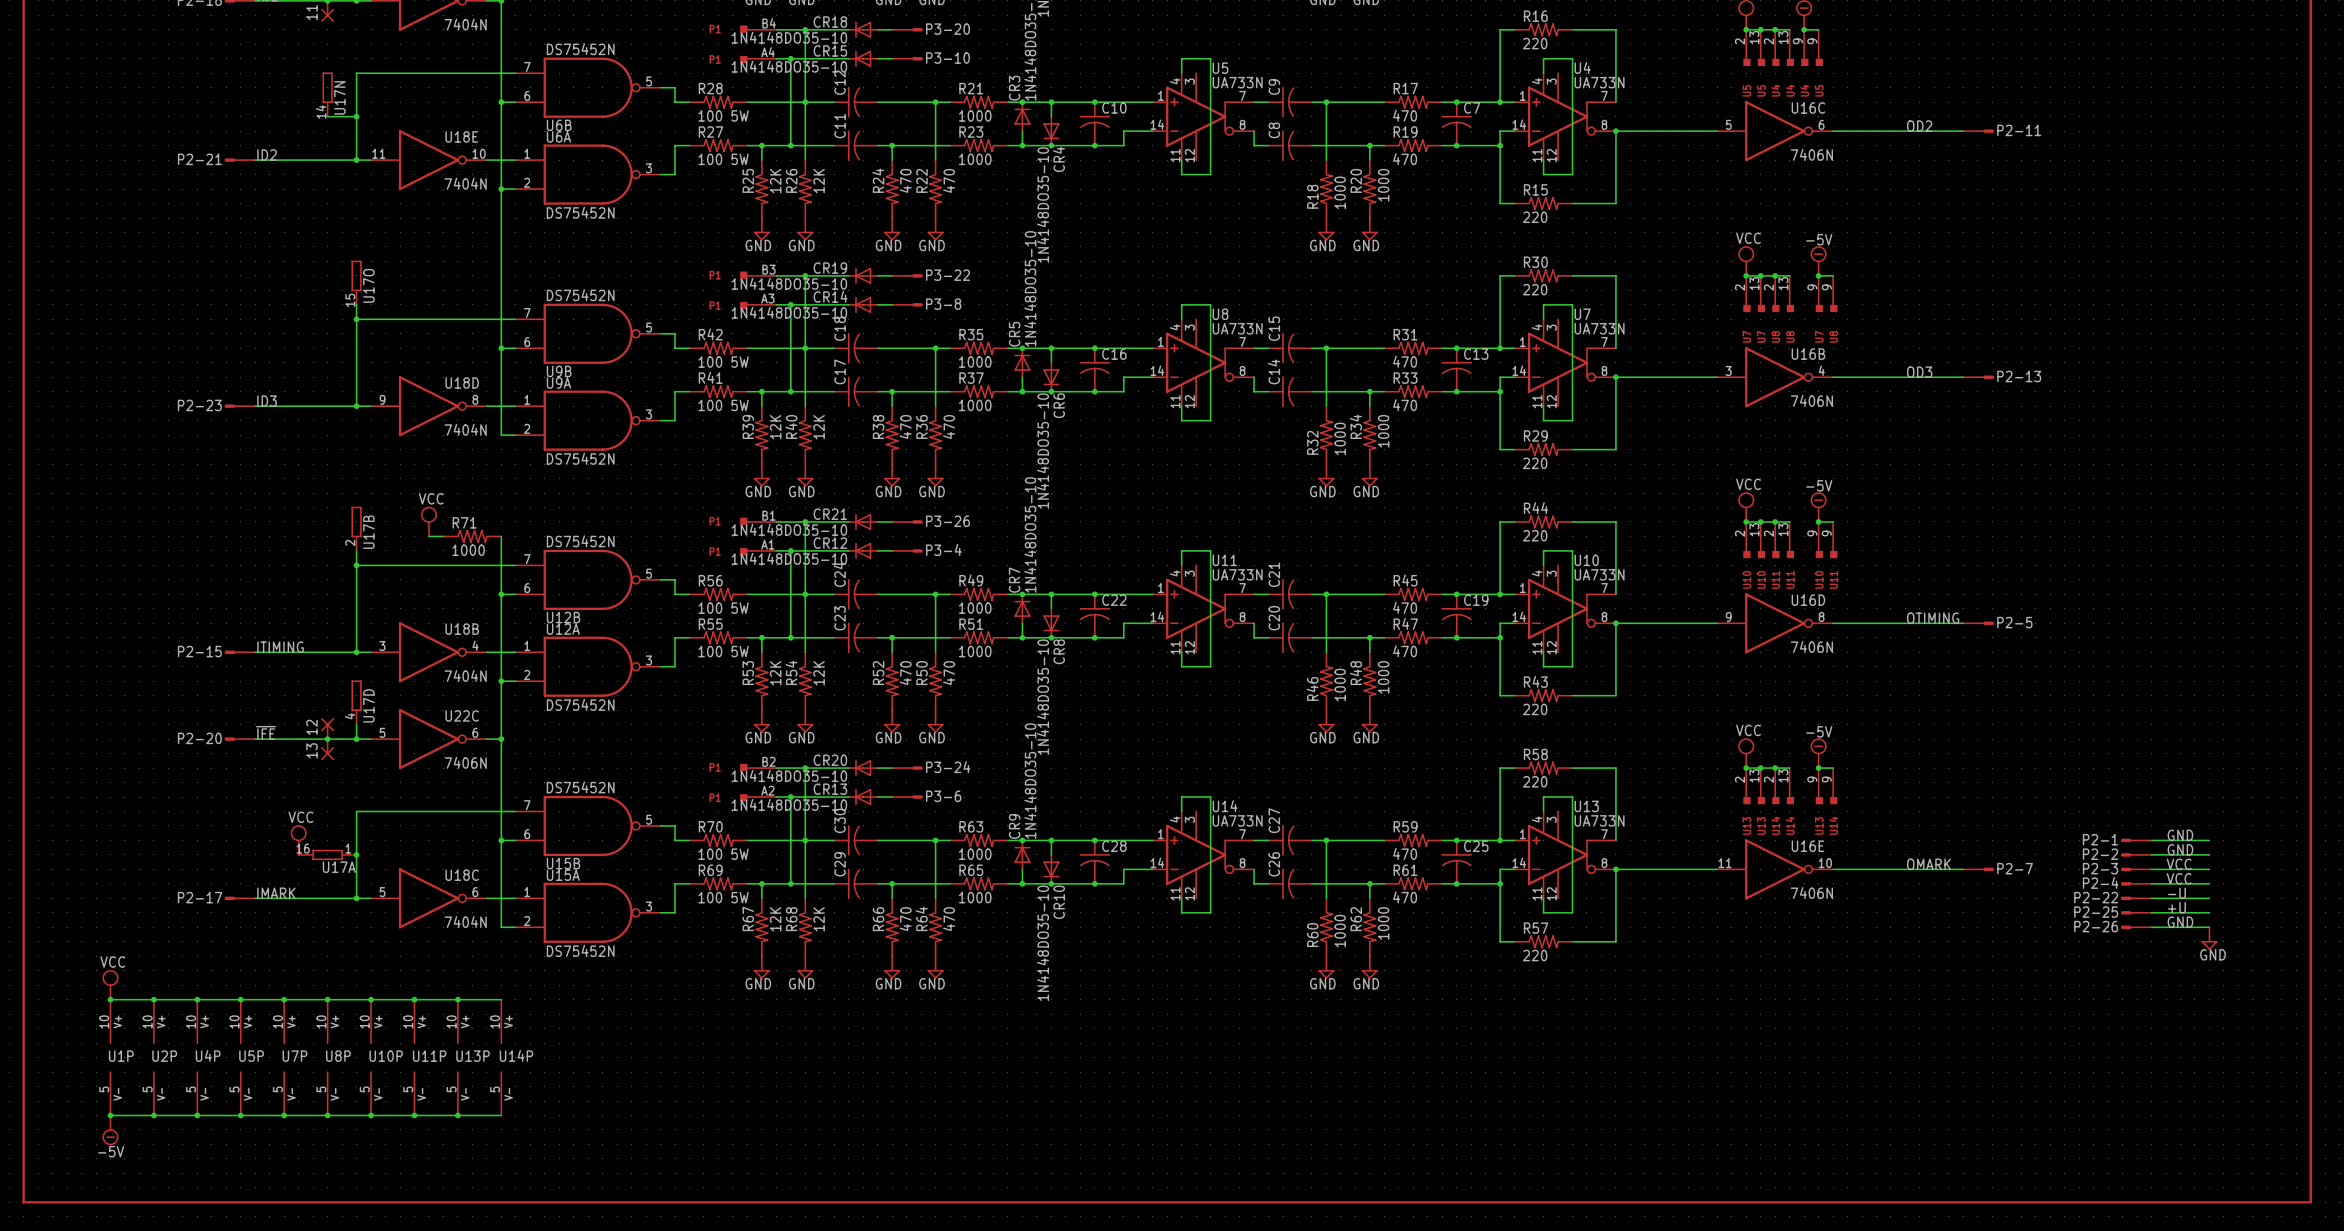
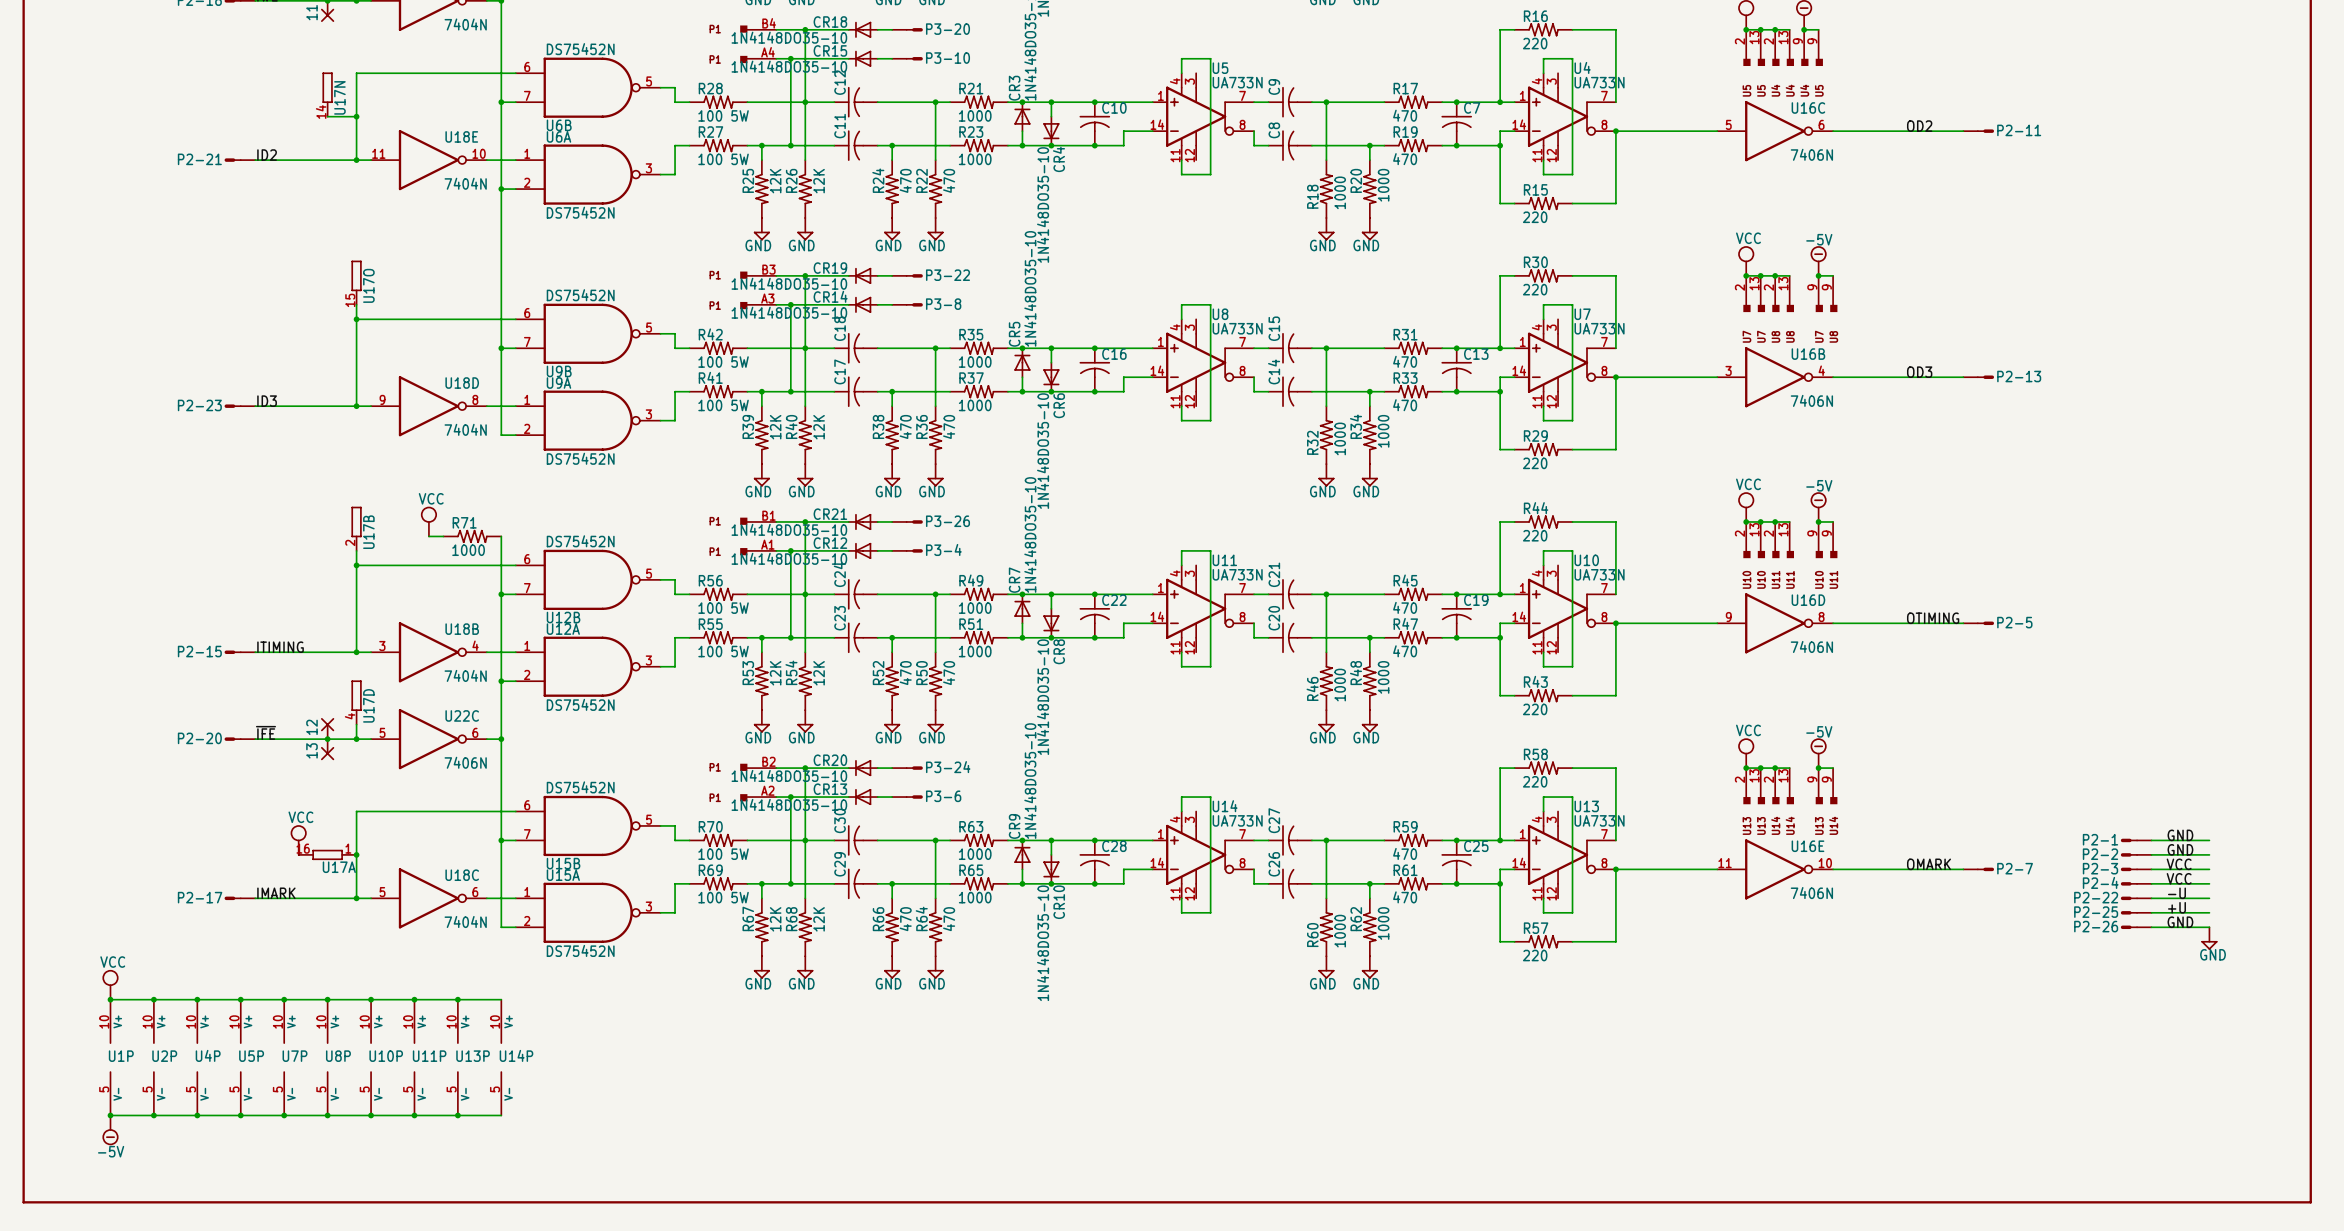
U6B flip: as is (588, 87) -> up-down (588, 87)
U9B flip: as is (588, 333) -> up-down (588, 333)
U12B flip: as is (588, 579) -> up-down (588, 579)
U15B flip: as is (588, 825) -> up-down (588, 825)

